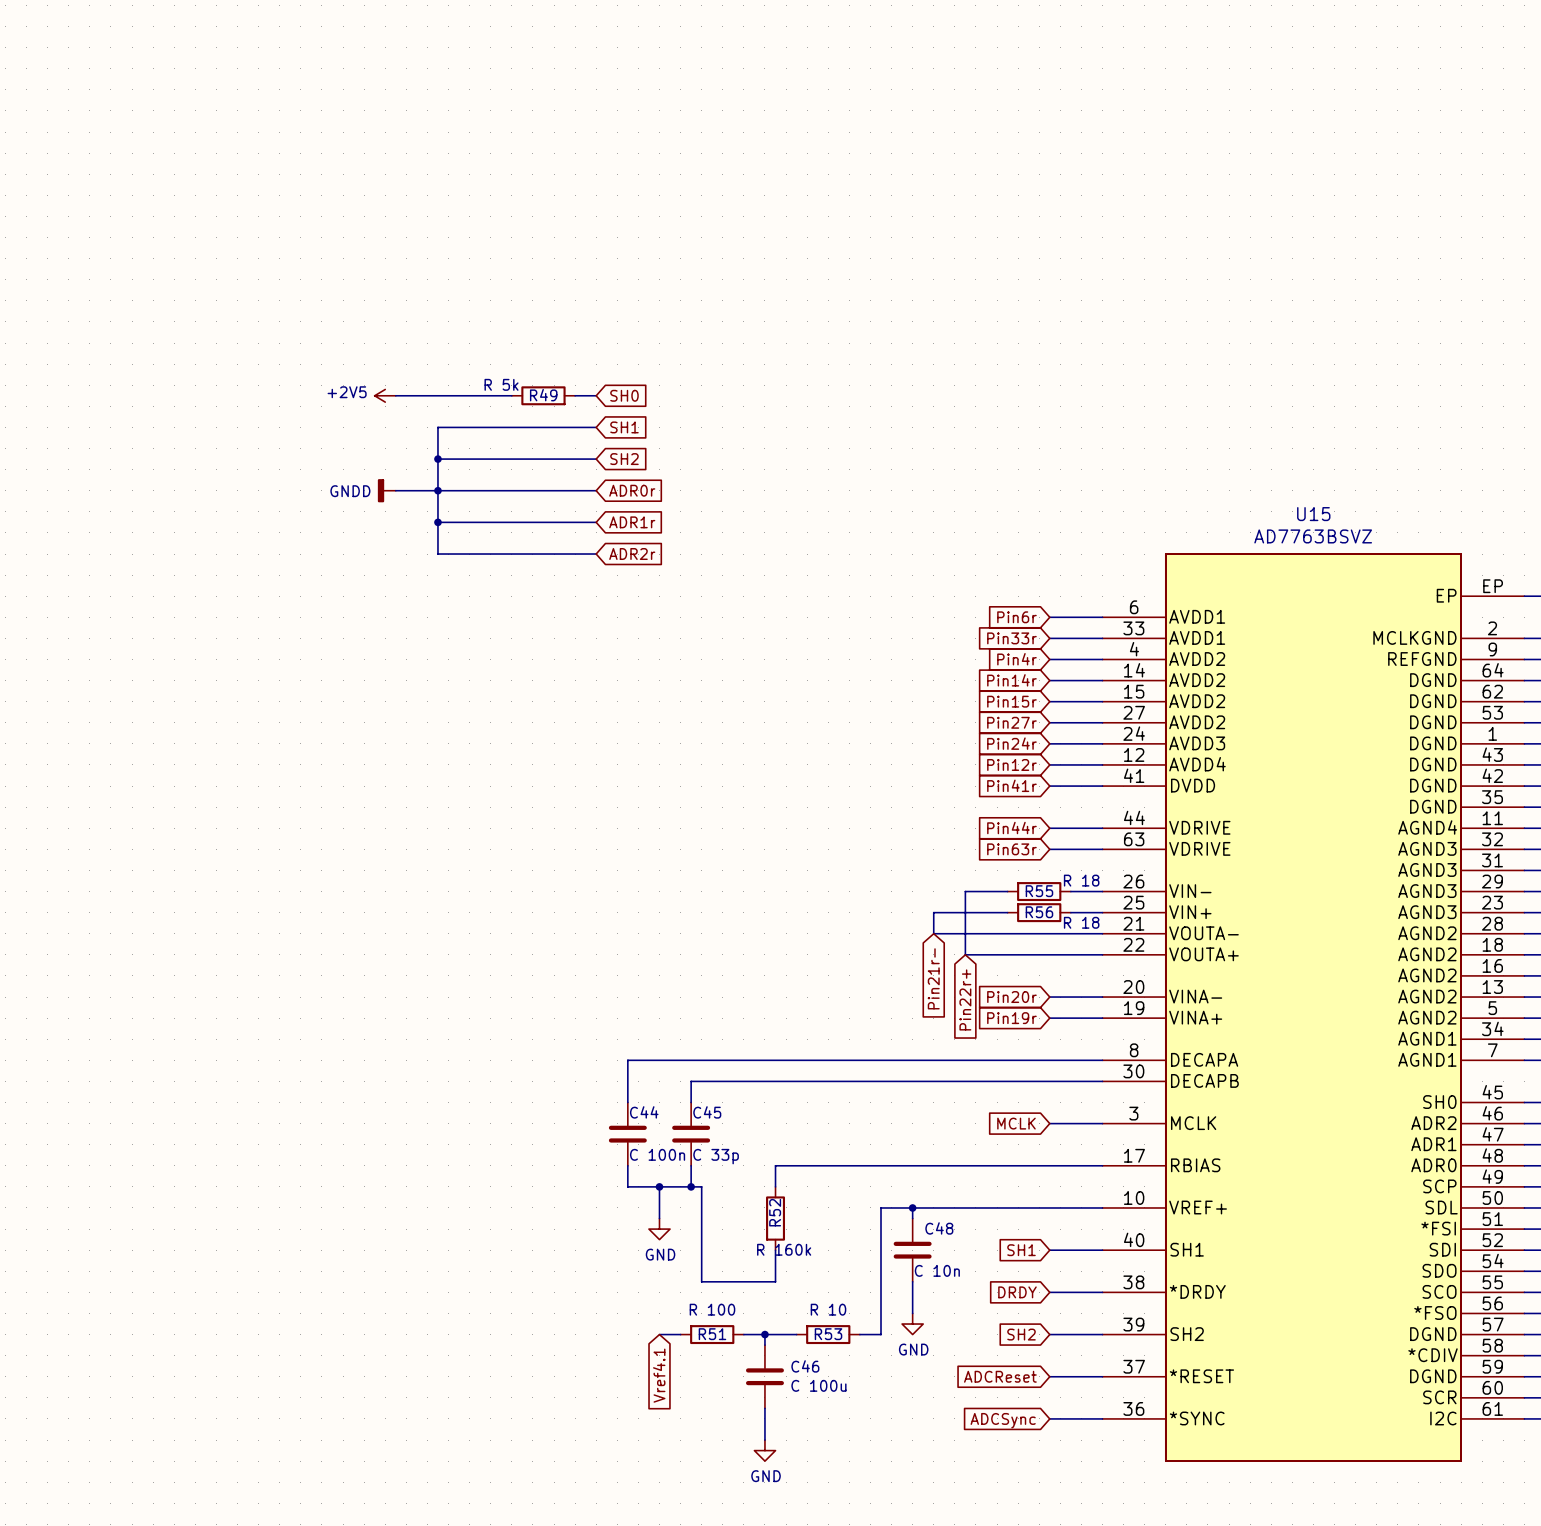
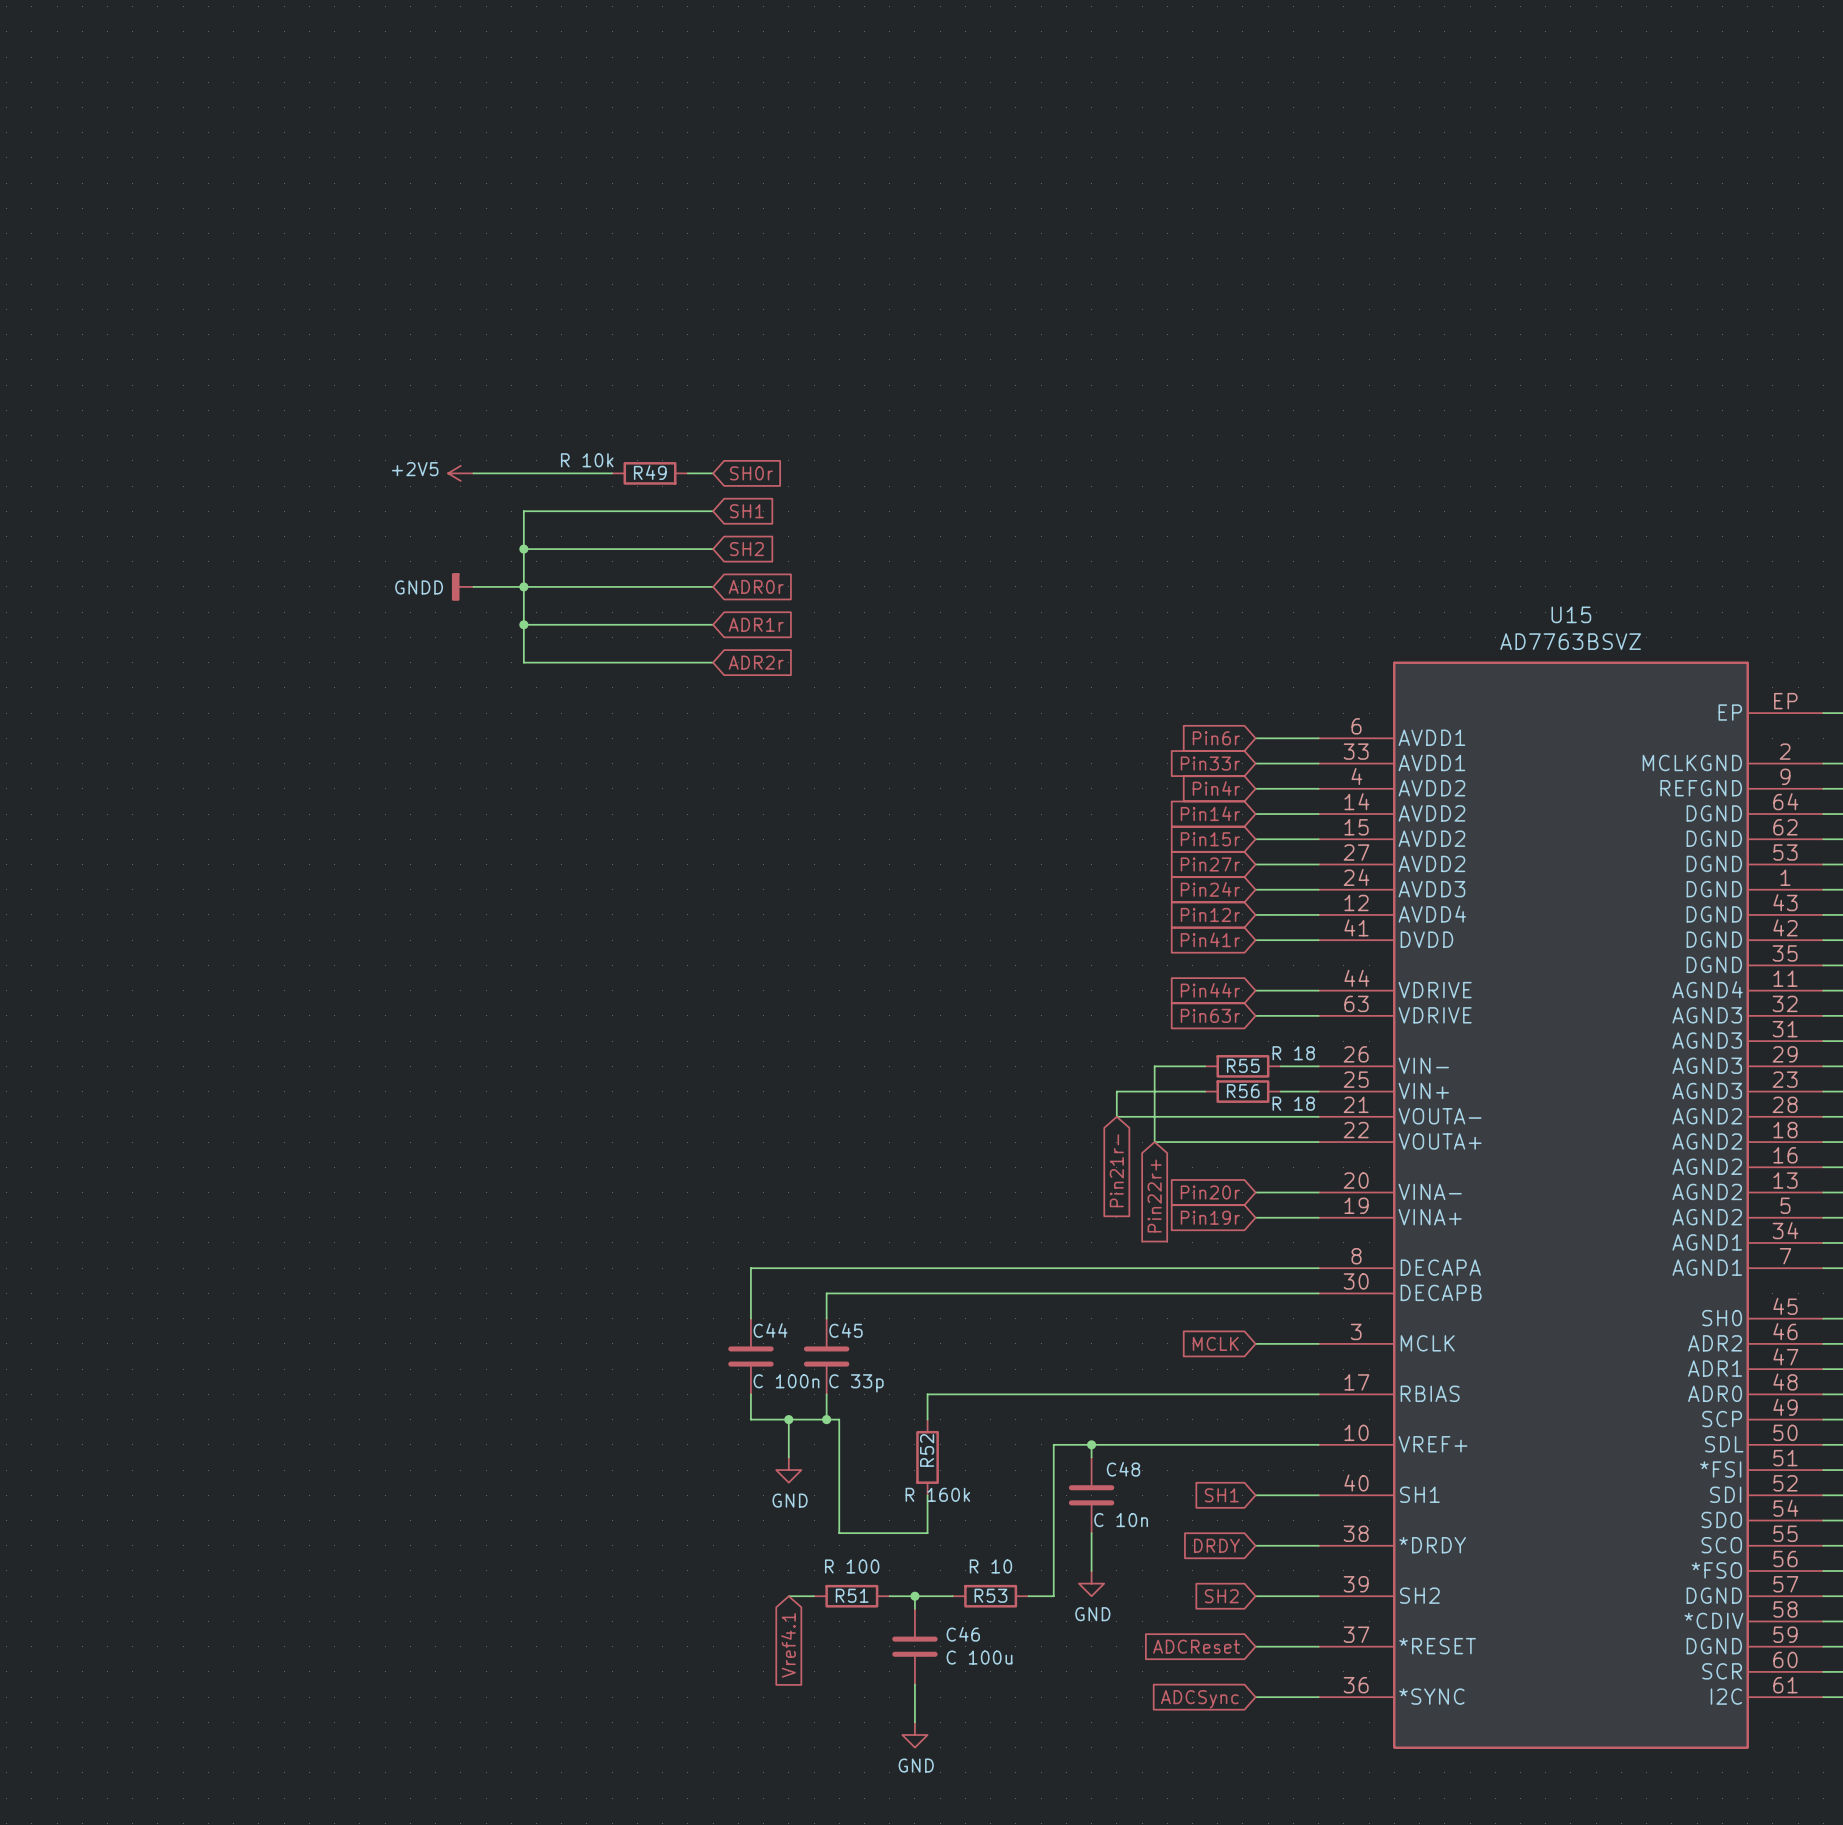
R49 value: R 5k (501, 384) -> R 10k (587, 460)
global label: SH0 (624, 395) -> SH0r (751, 473)

